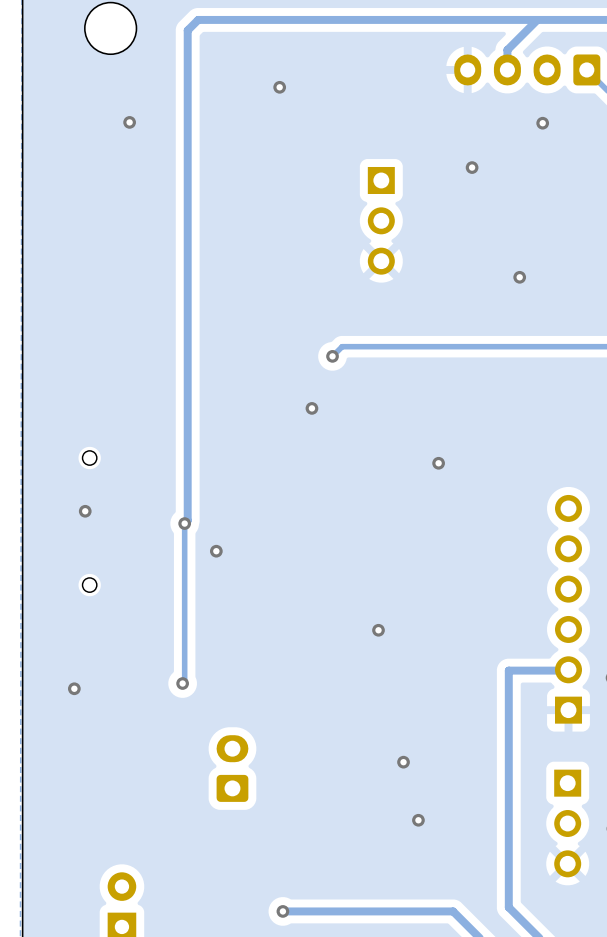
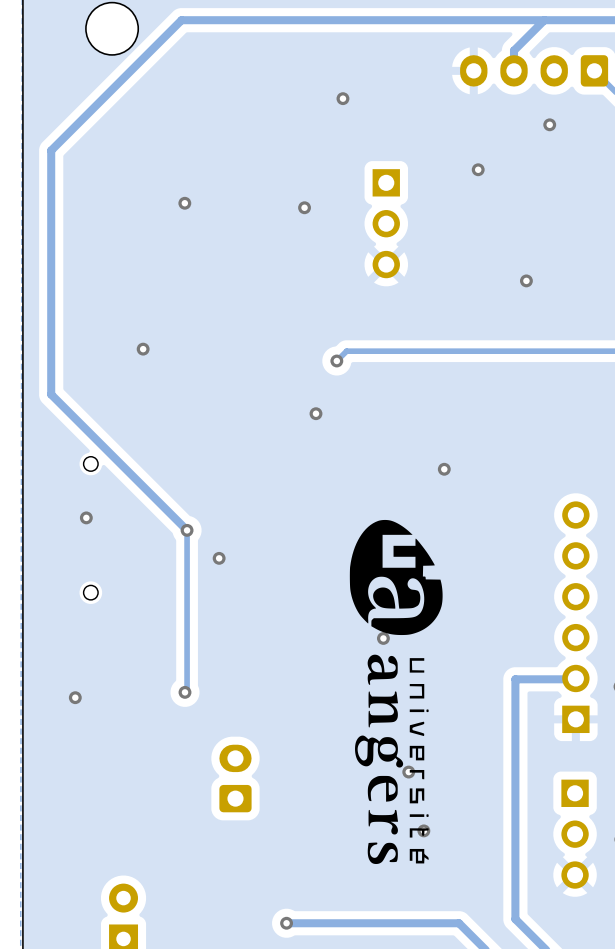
track: (198, 19) (187, 30) (187, 520) (184, 523) -> (200, 20) (181, 20) (51, 150) (51, 394) (187, 530)
via: (279, 87) -> none
via: none -> (342, 98)
via: (129, 122) -> none
via: none -> (184, 203)
via: none -> (304, 207)
via: none -> (143, 349)
drawing: none -> [349, 519, 443, 636]
drawing: none -> [355, 654, 429, 865]

